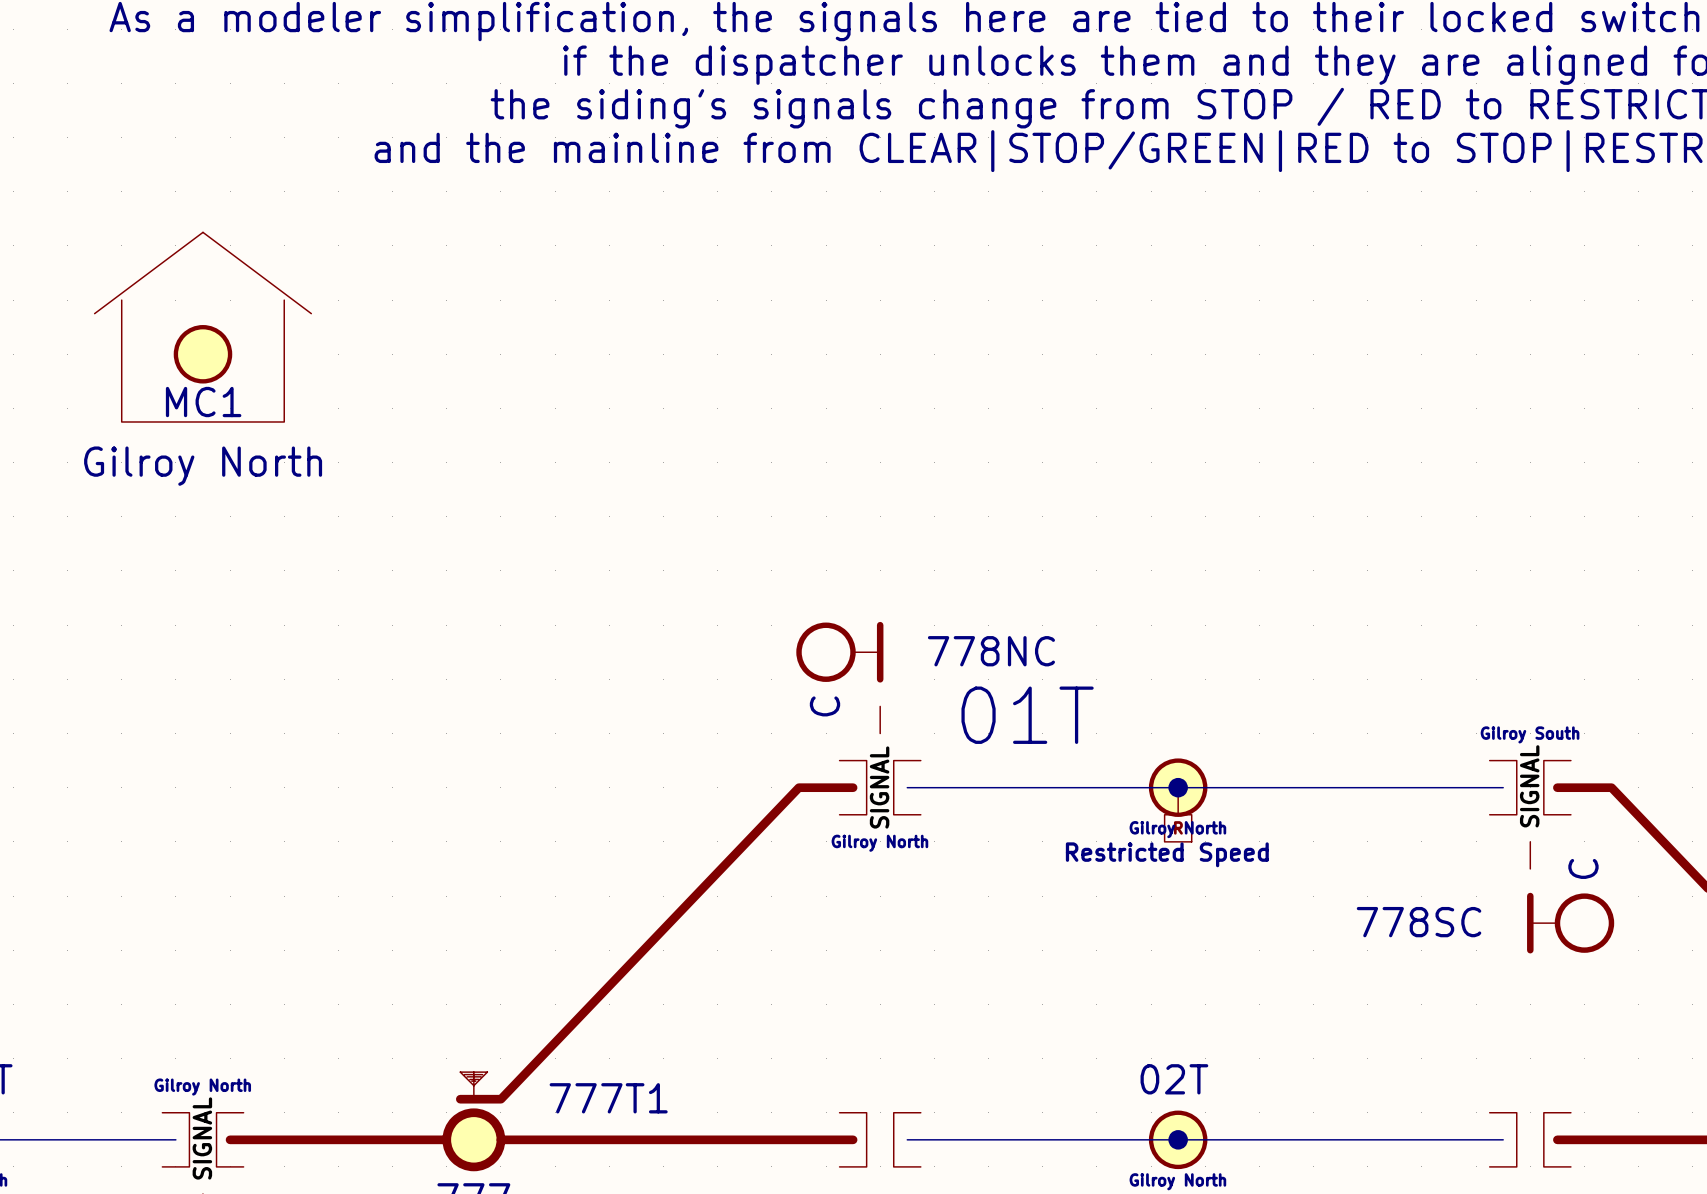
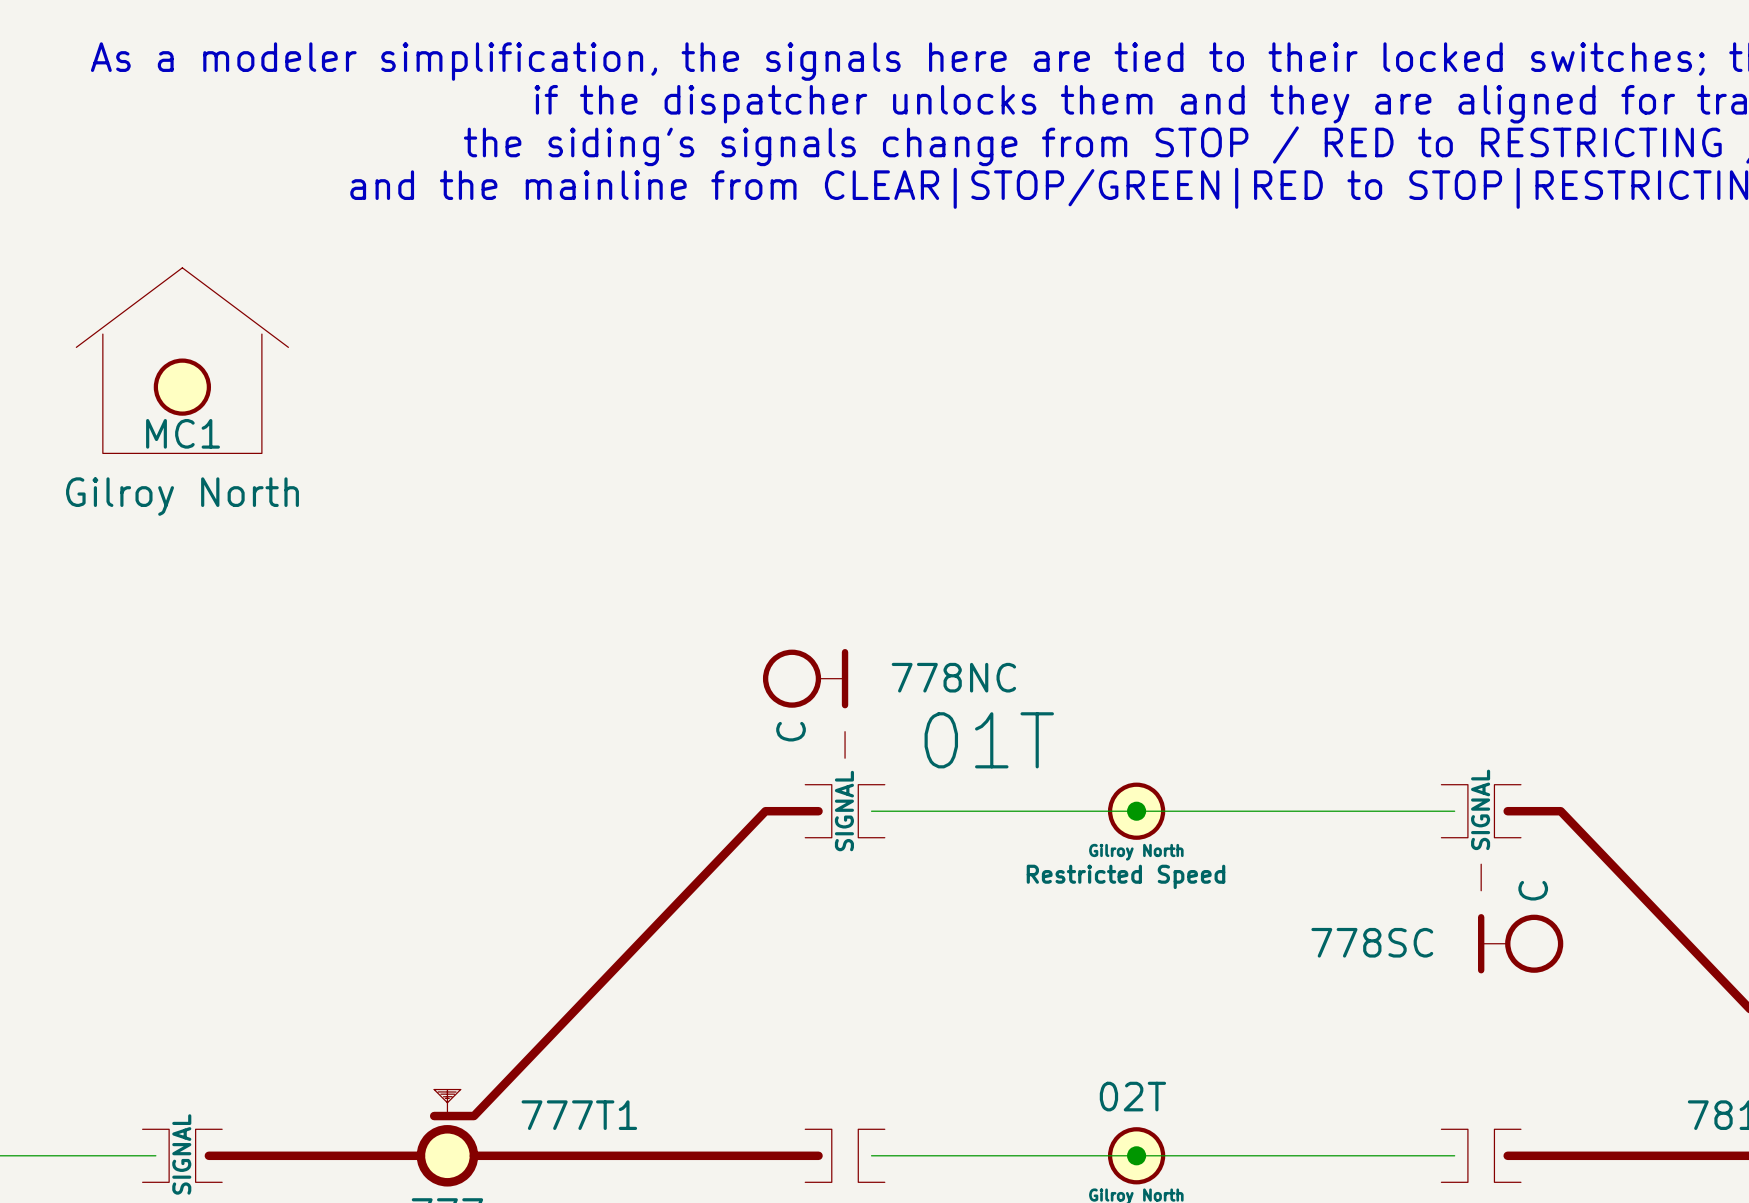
part text: Gilroy South (1530, 734) -> none
part: Restricted Speed (1178, 814) -> none
part text: Gilroy North (879, 843) -> none
part: none -> Restricted Speed (1125, 876)
part text: Gilroy North (202, 1087) -> none

